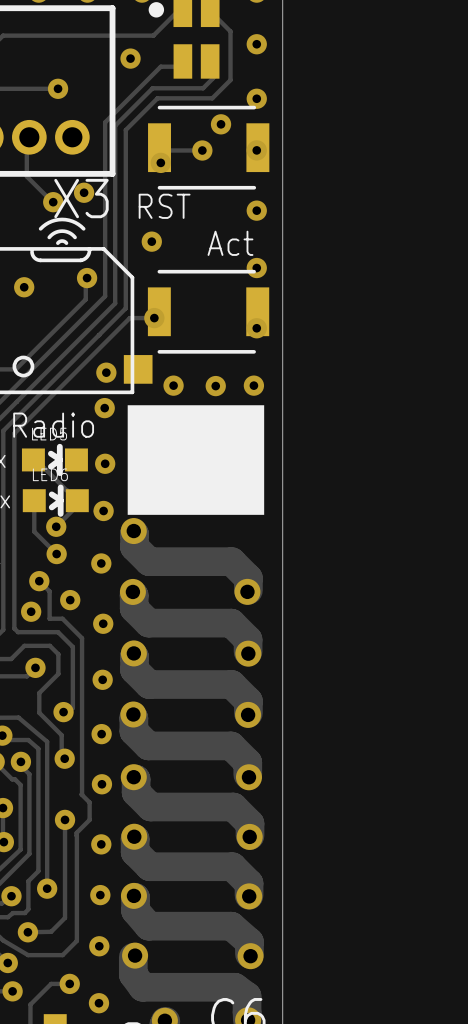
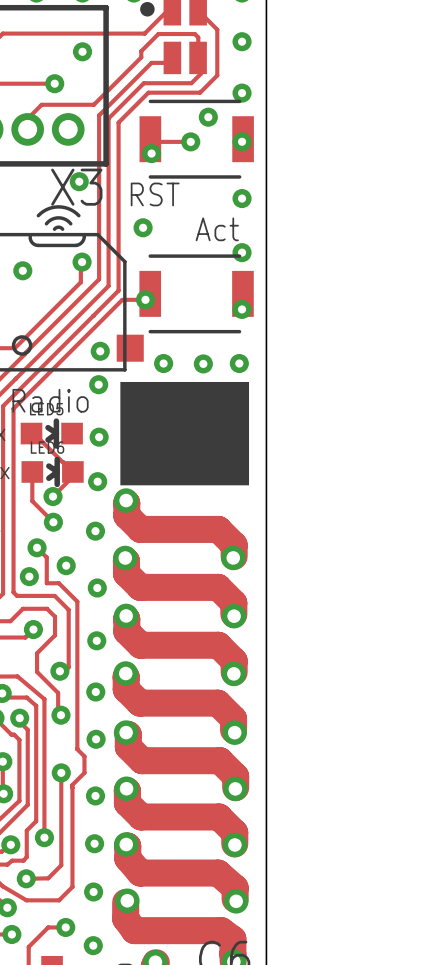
via position: (130, 58) -> (82, 51)
track: (29, 137) (26, 139) (26, 176) (53, 202) -> (27, 129) (27, 118) (41, 104) (93, 104) (141, 57) (141, 51) (158, 34) (194, 34) (198, 37) (198, 57)
via: (53, 202) -> none

